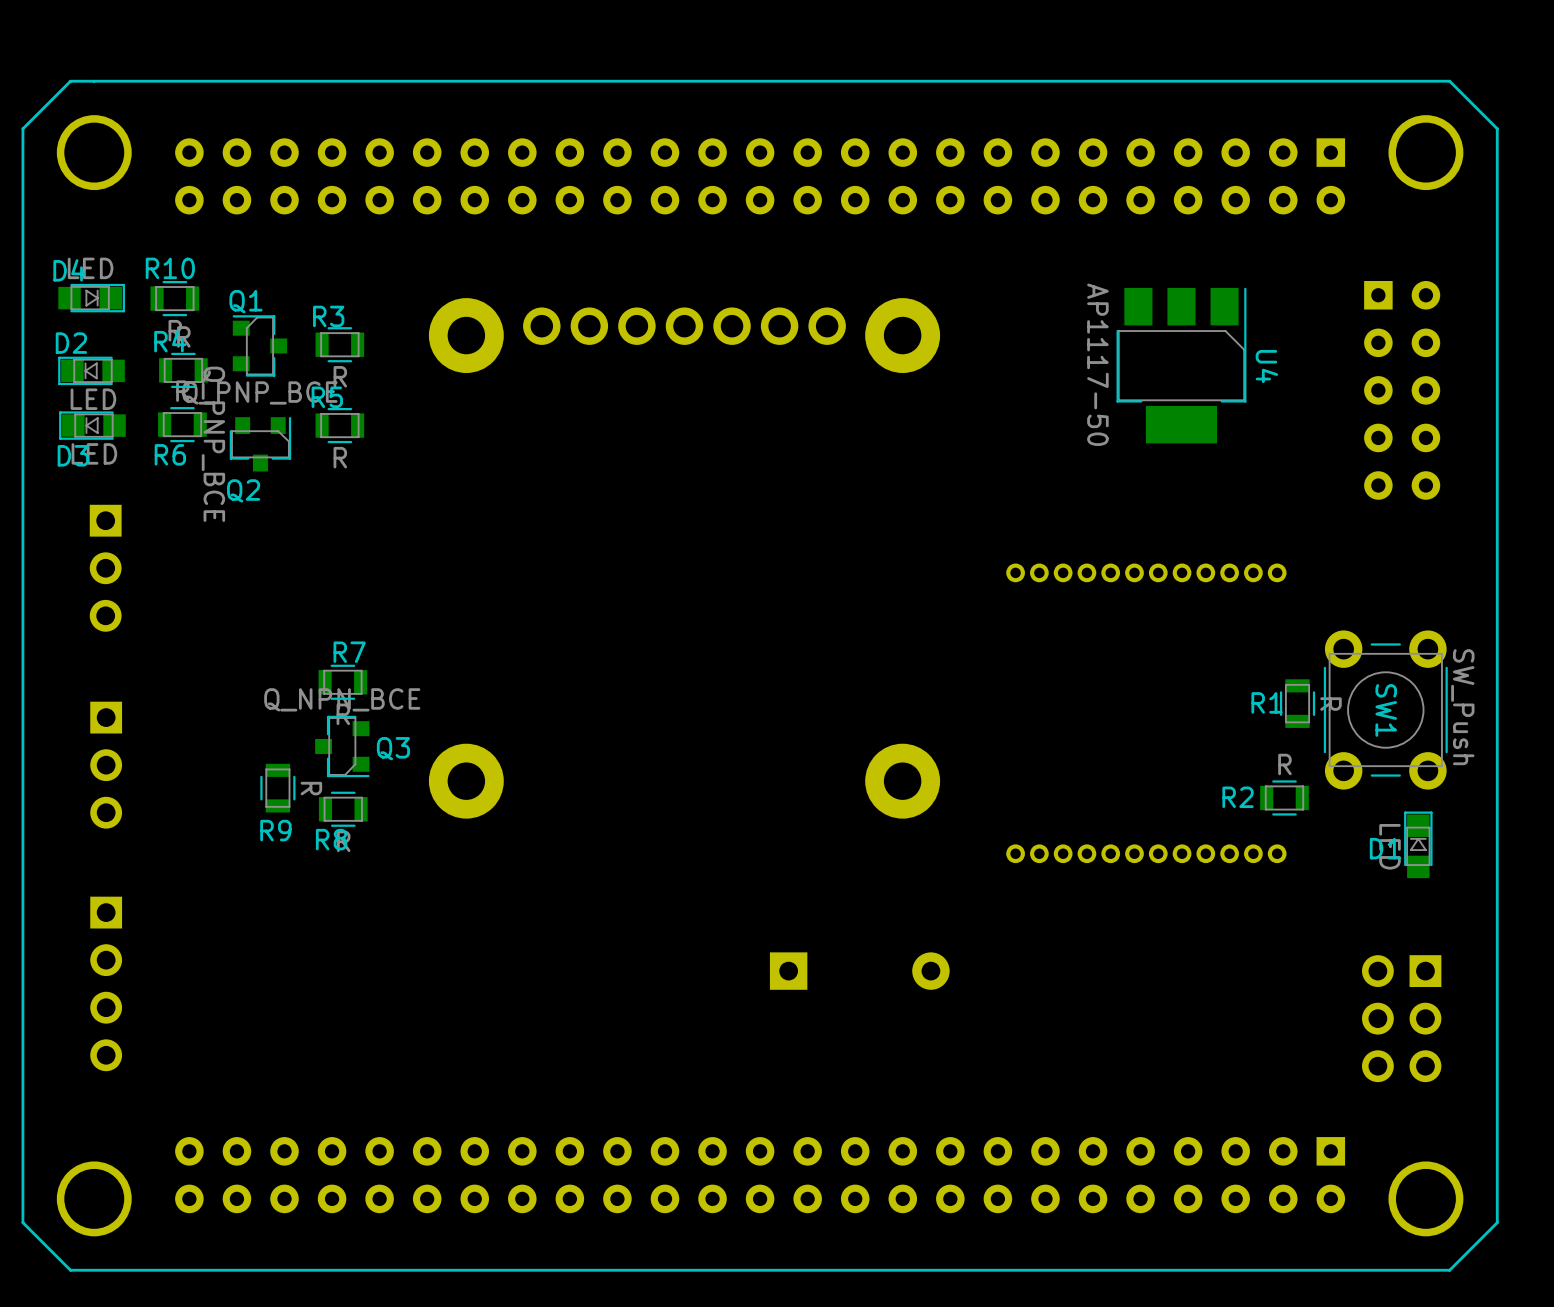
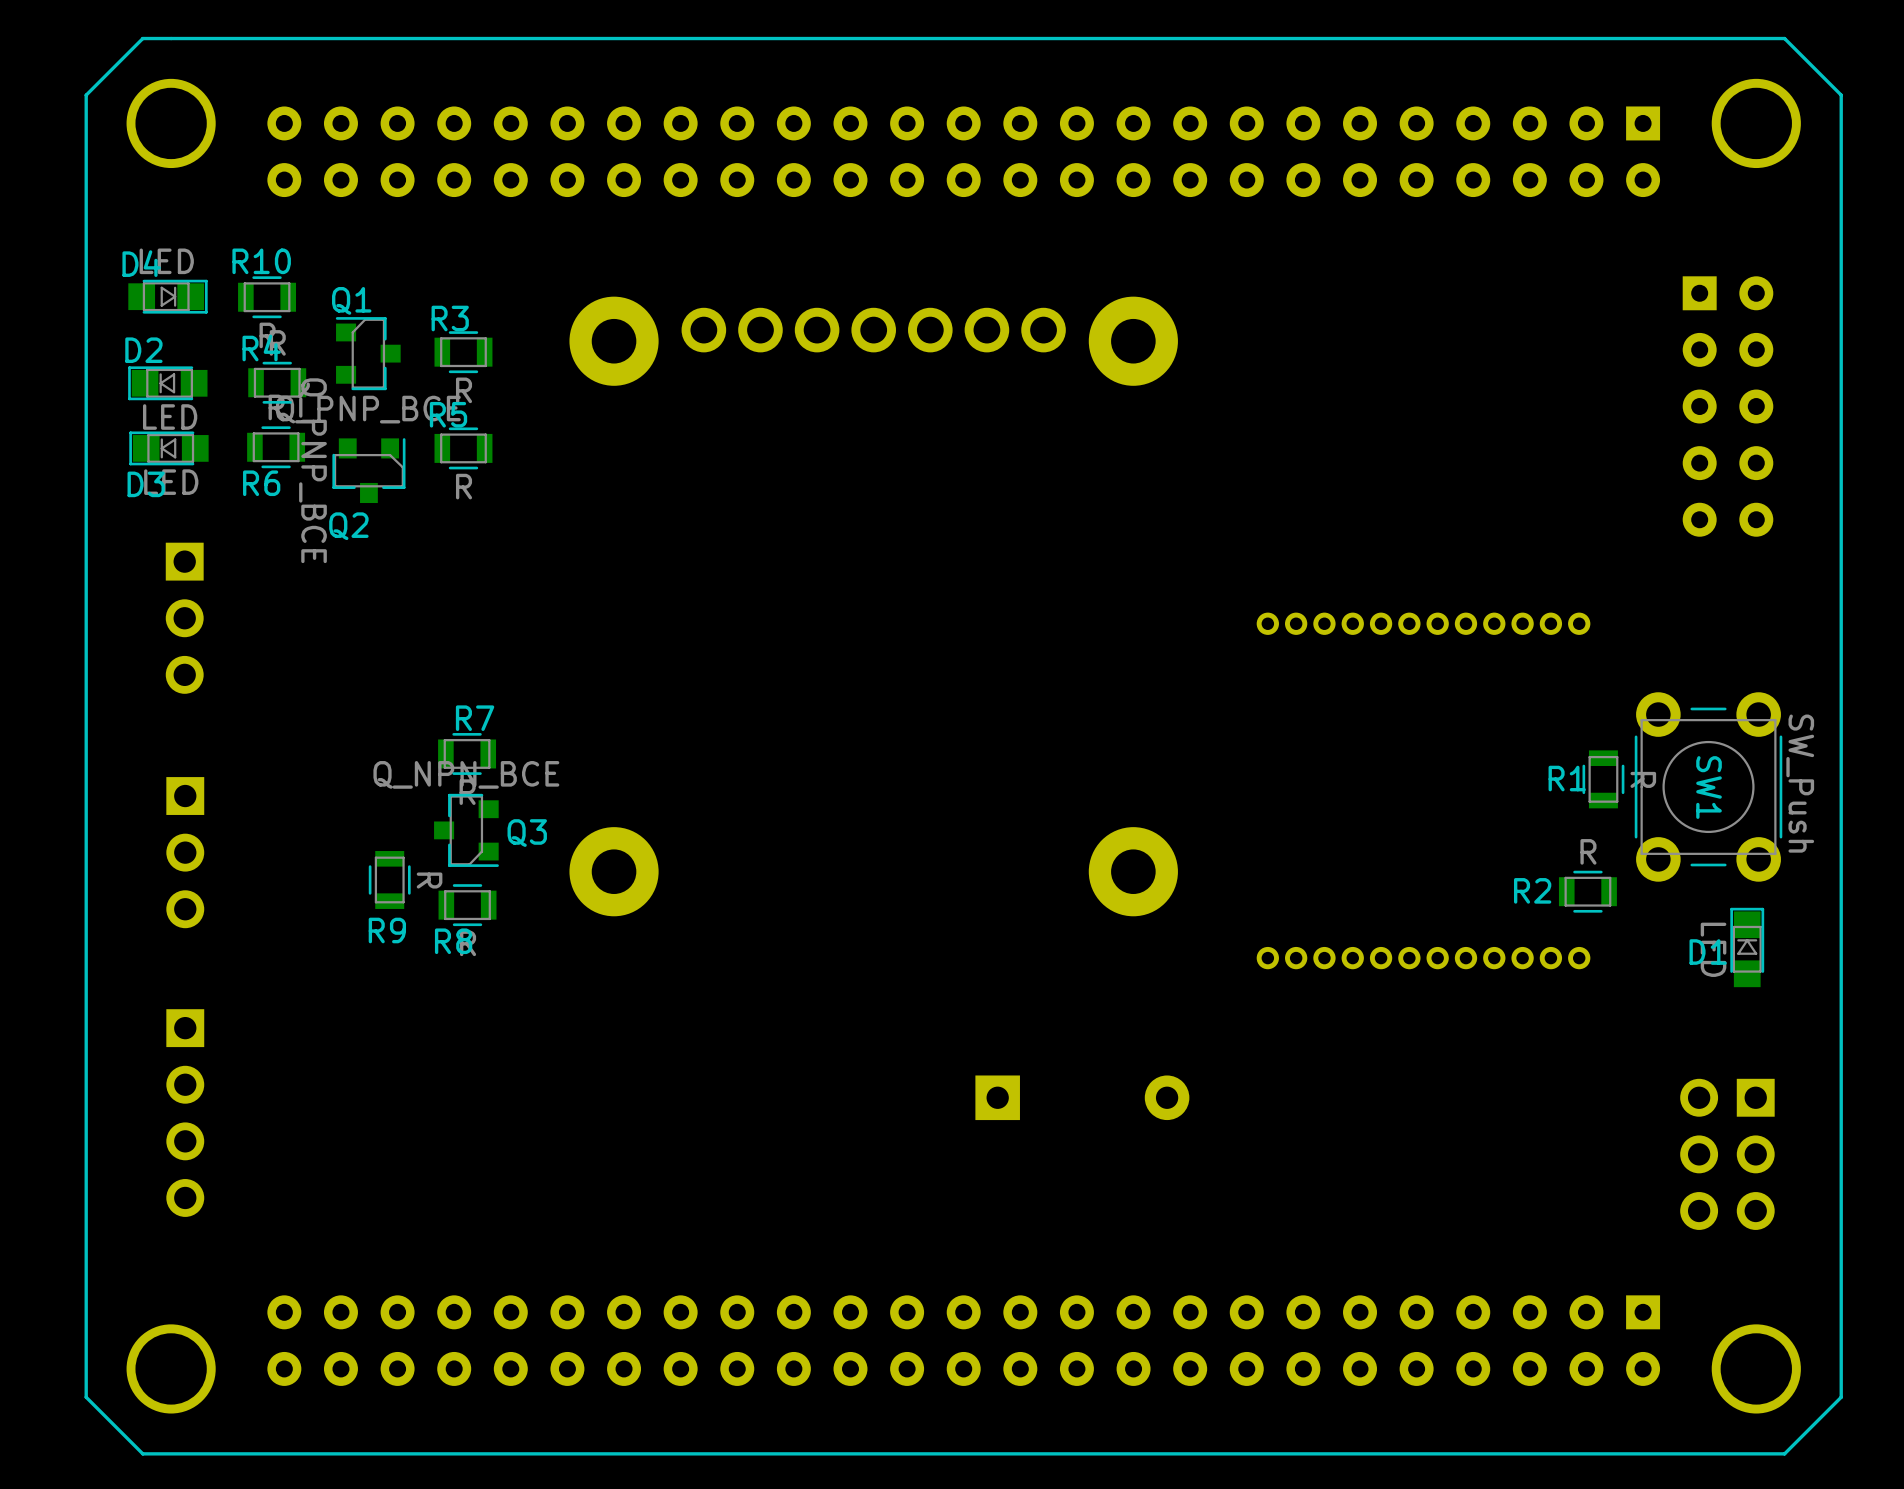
U4: AP1117-50 (1181, 365) -> none

